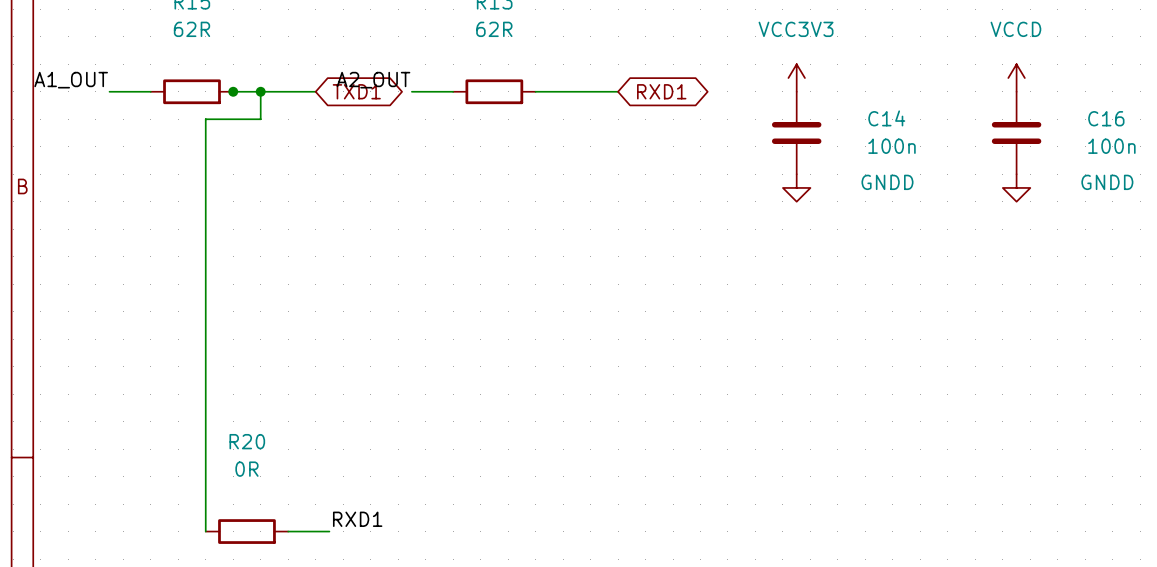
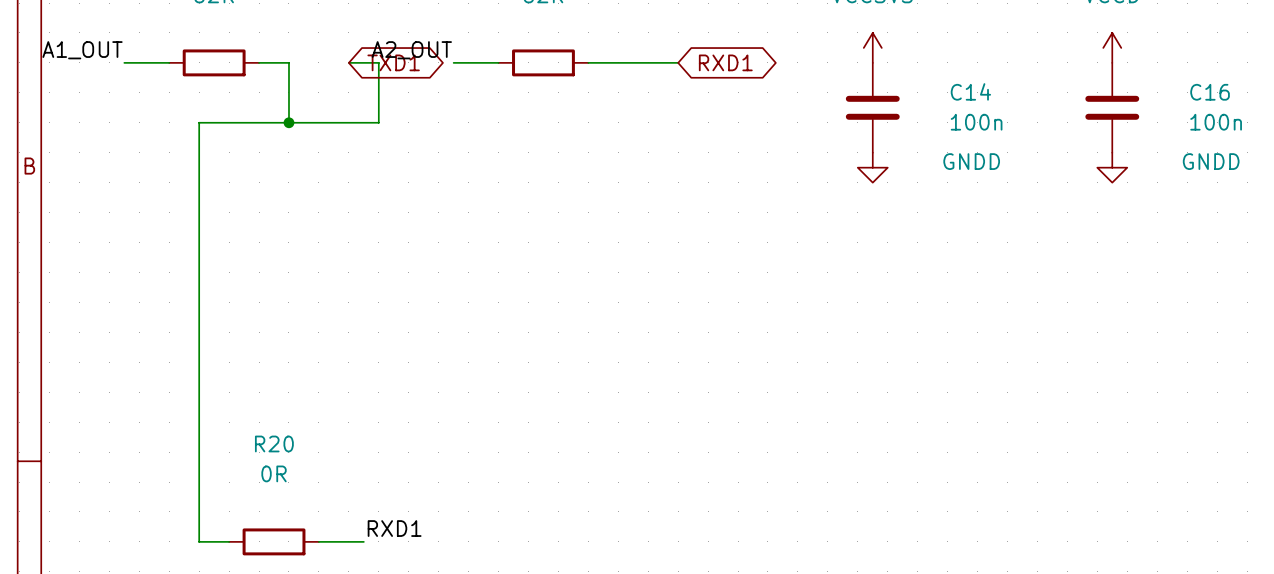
junction: (233, 91) -> none
wire: (260, 91) (315, 91) -> none
junction: (260, 91) -> none
wire: (260, 119) (205, 119) (205, 531) -> (348, 62) (378, 62) (378, 122) (199, 122) (199, 541) (229, 541)
wire: none -> (288, 92) (288, 122)
junction: none -> (288, 122)

